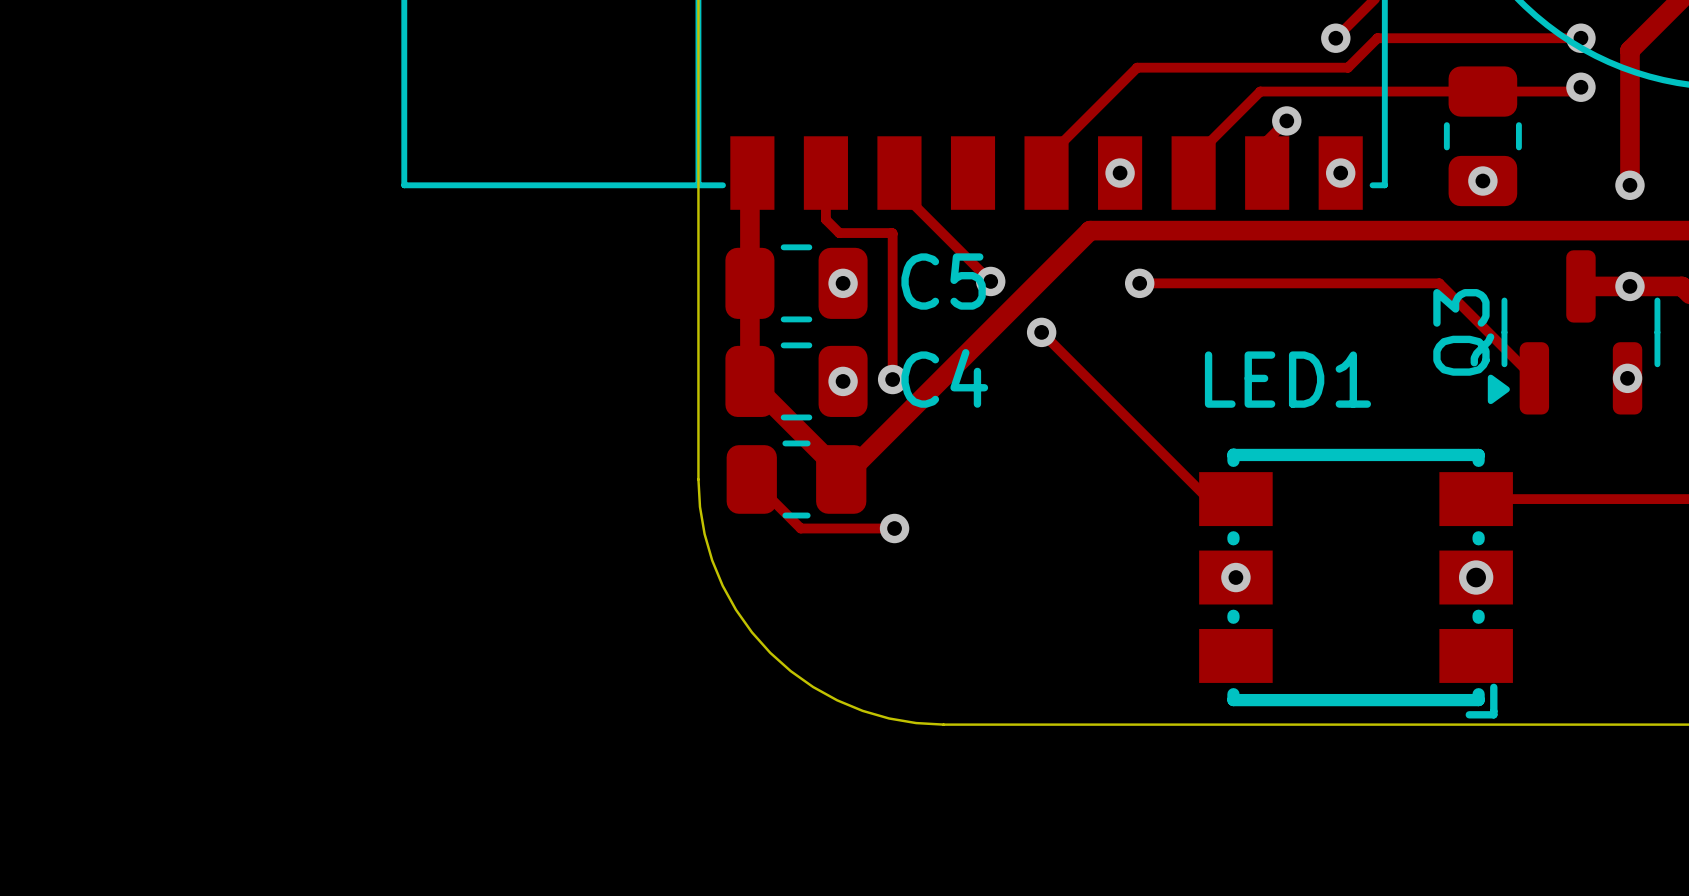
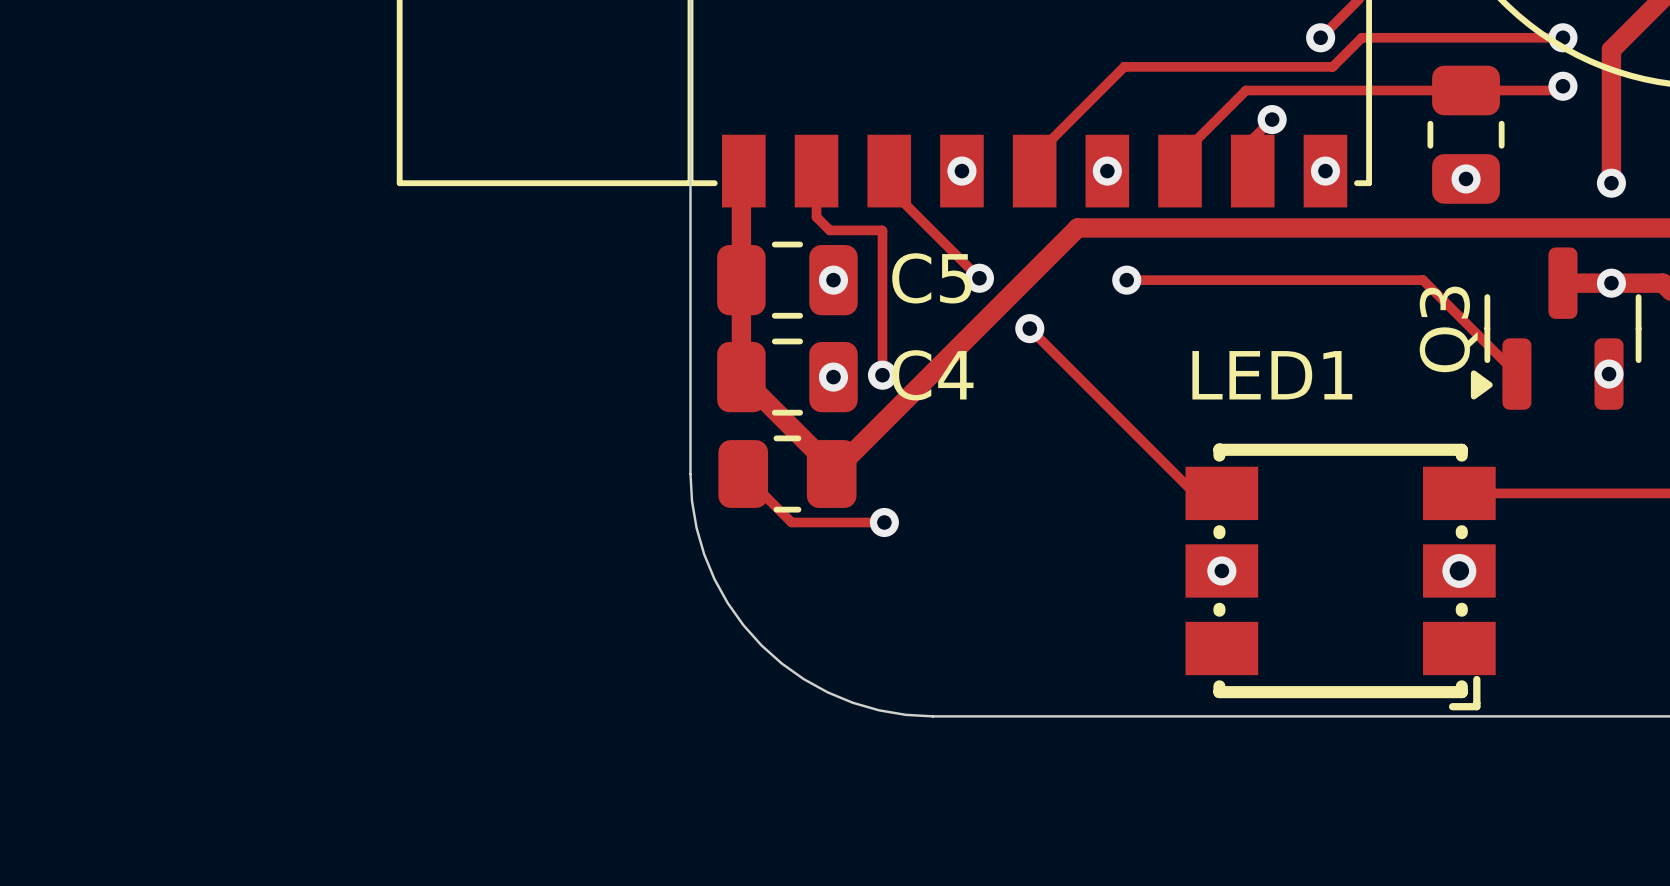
via: none -> (961, 171)

